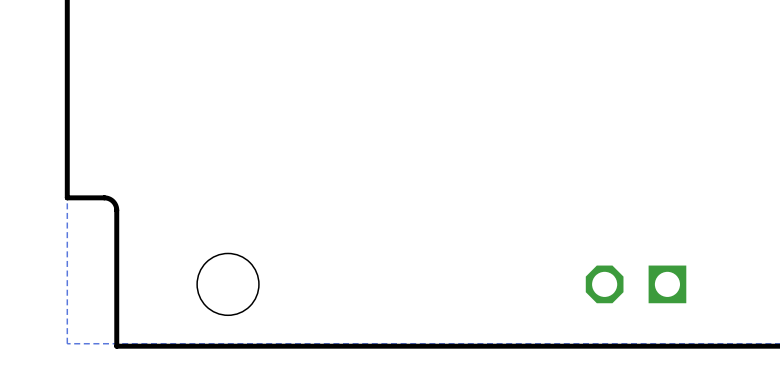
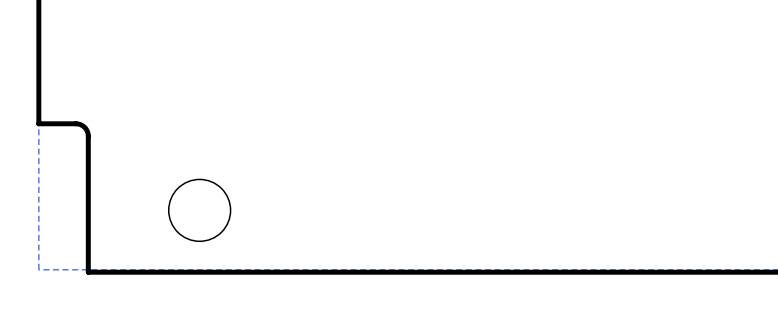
part: (636, 284) -> none

